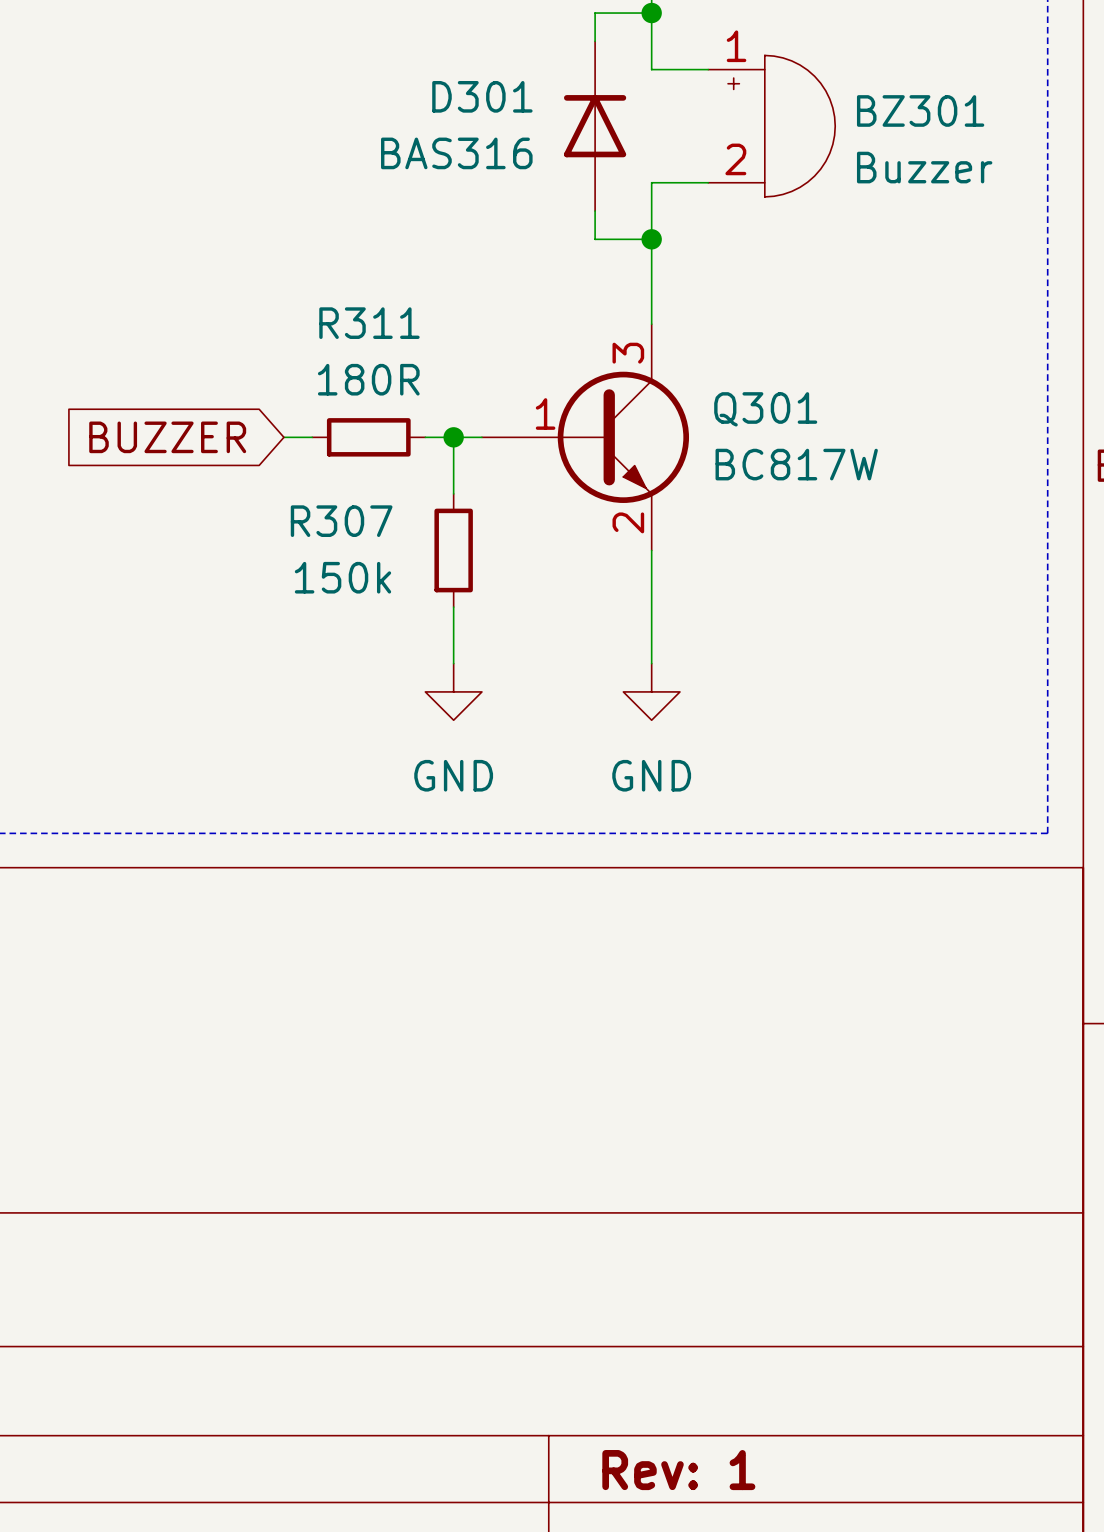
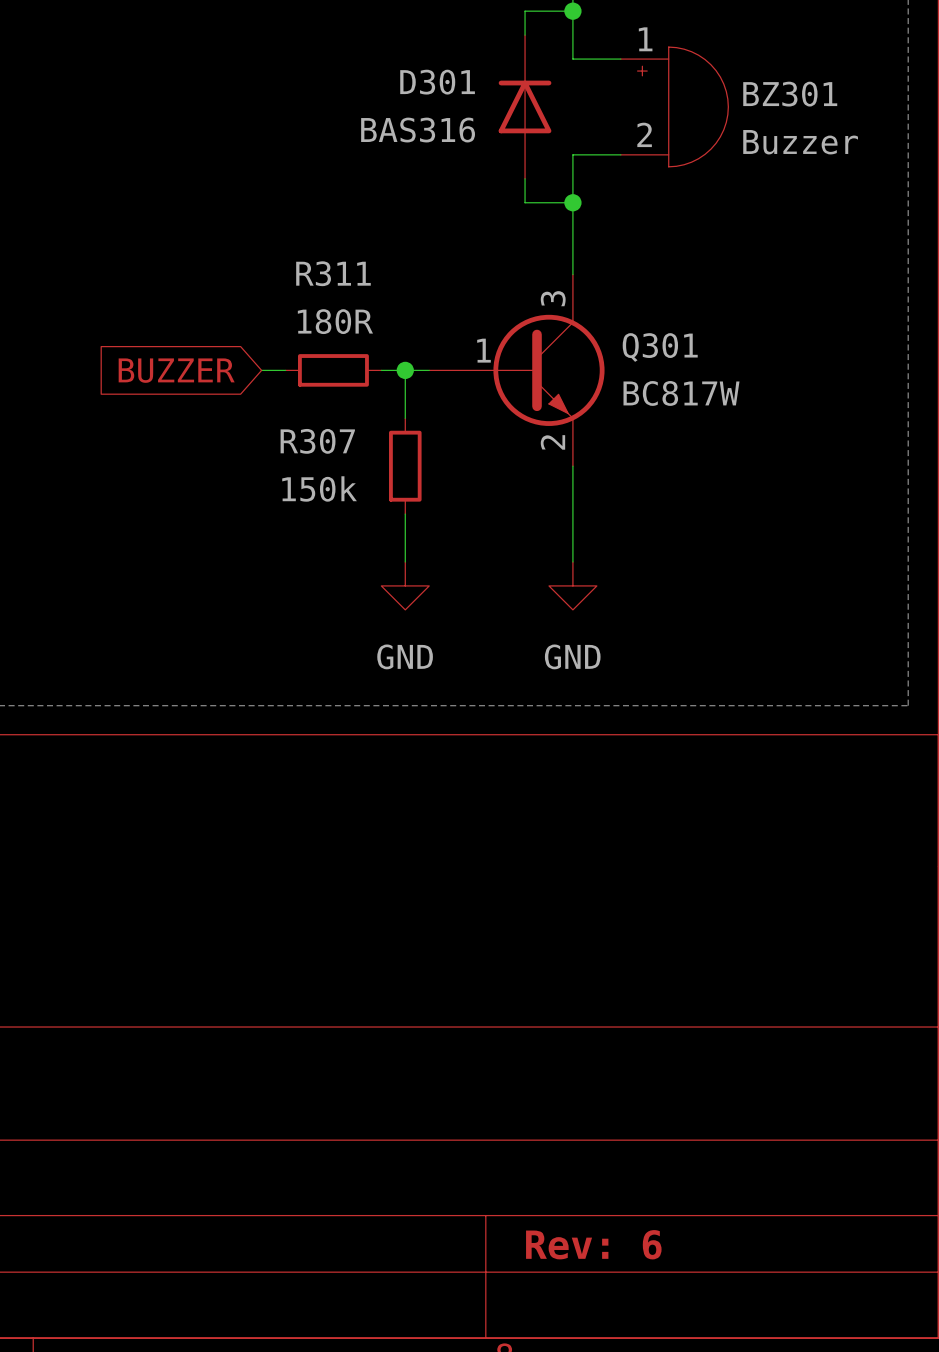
title block: Rev: 1 (678, 1470) -> Rev: 6 (593, 1244)

